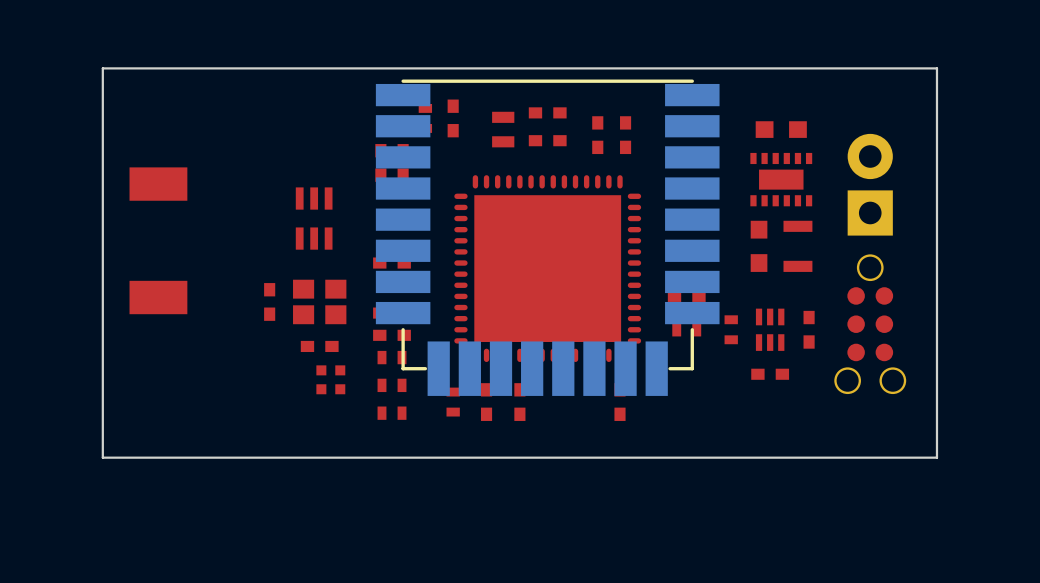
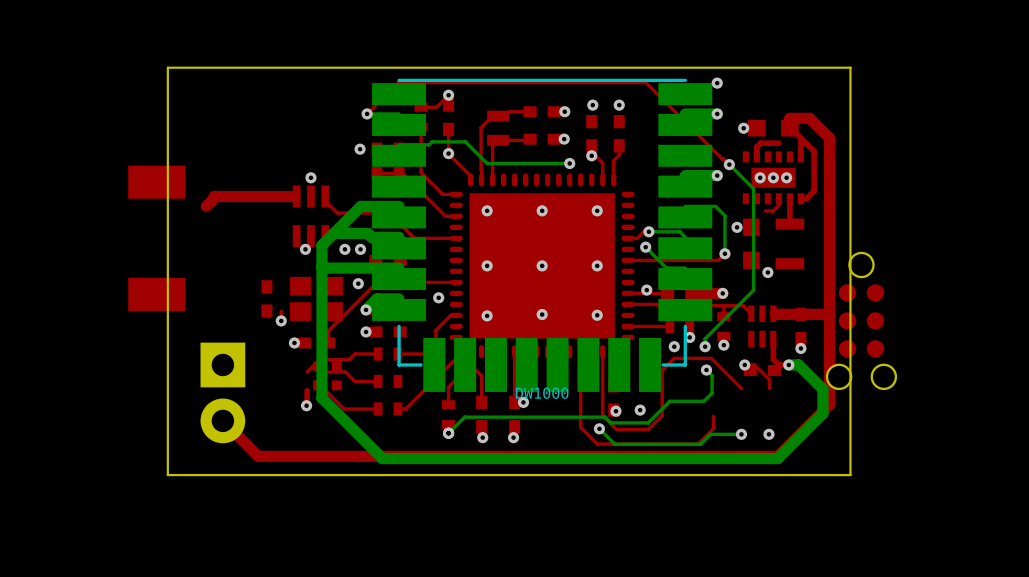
board edge: (859, 68) (936, 68) (936, 457) (102, 457) (102, 68) (169, 68) -> (850, 67) (850, 475) (167, 475) (167, 67)
via: none -> (717, 83)
via: none -> (448, 95)
top track: none -> (448, 105) (448, 95) (436, 107) (421, 107)
via: none -> (592, 105)
via: none -> (619, 105)
top track: none -> (530, 111) (509, 111) (505, 116) (492, 116) (481, 127) (481, 180)
via: none -> (564, 111)
top track: none -> (367, 113) (398, 82) (645, 82) (729, 164)
via: none -> (367, 113)
bottom track: none -> (399, 113) (367, 113)
bottom track: none -> (717, 113) (685, 113)
via: none -> (717, 113)
top track: none -> (421, 127) (421, 172) (442, 194) (456, 194)
via: none -> (743, 128)
top track: none -> (448, 129) (448, 154) (470, 176) (470, 180)
top track: none -> (800, 138) (800, 156)
top track: none -> (530, 139) (498, 140) (492, 145) (492, 180)
via: none -> (564, 139)
top track: none -> (619, 140) (619, 155) (613, 160) (613, 180)
top track: none -> (778, 143) (760, 143) (756, 146) (756, 156)
bottom track: none -> (399, 144) (465, 141) (487, 163) (569, 163)
via: none -> (360, 149)
top track: none -> (591, 152) (602, 163) (602, 180)
via: none -> (448, 153)
via: none -> (591, 155)
via: none -> (569, 163)
bottom track: none -> (729, 164) (753, 188) (753, 290) (705, 338) (705, 346)
via: none -> (729, 164)
top track: none -> (377, 173) (402, 173) (445, 216) (456, 216)
bottom track: none -> (717, 175) (685, 175)
via: none -> (717, 175)
via: none -> (310, 177)
via: none -> (760, 177)
via: none -> (773, 177)
via: none -> (786, 177)
part: (870, 184) -> none
top track: none -> (216, 196) (206, 206)
top track: none -> (296, 196) (214, 196)
top track: none -> (325, 196) (325, 200) (337, 213) (389, 213) (414, 238) (456, 238)
top track: none -> (778, 198) (778, 205) (773, 211) (765, 211)
top track: none -> (789, 198) (789, 224)
top track: none -> (800, 198) (806, 198) (814, 191) (814, 151) (789, 127) (789, 118) (809, 118) (829, 138) (829, 404) (777, 456) (258, 456) (222, 420)
bottom track: none -> (399, 206) (360, 206) (321, 245) (321, 398) (382, 458) (777, 458) (822, 413) (822, 389) (798, 364) (788, 364)
bottom track: none -> (685, 206) (715, 206) (724, 215) (724, 253)
via: none -> (487, 210)
via: none -> (542, 210)
via: none -> (597, 210)
via: none -> (737, 227)
top track: none -> (648, 231) (643, 231) (637, 238) (628, 238)
bottom track: none -> (648, 231) (679, 231) (685, 237)
via: none -> (648, 231)
bottom track: none -> (333, 233) (367, 233) (371, 237) (399, 237)
bottom track: none -> (645, 247) (666, 268) (685, 268)
via: none -> (645, 247)
via: none -> (305, 249)
via: none -> (344, 249)
via: none -> (360, 249)
top track: none -> (724, 253) (718, 260) (628, 260)
via: none -> (724, 253)
via: none -> (487, 265)
via: none -> (542, 265)
via: none -> (597, 265)
bottom track: none -> (321, 266) (399, 268)
via: none -> (767, 272)
top track: none -> (456, 282) (377, 282) (328, 330) (328, 342)
via: none -> (358, 283)
via: none -> (646, 290)
top track: none -> (667, 293) (628, 293)
top track: none -> (722, 293) (691, 293)
via: none -> (722, 293)
via: none -> (438, 297)
bottom track: none -> (399, 298) (377, 298) (366, 309)
top track: none -> (628, 304) (743, 305) (751, 313)
top track: none -> (723, 305) (723, 316)
via: none -> (366, 309)
top track: none -> (281, 311) (281, 320)
top track: none -> (775, 313) (829, 314)
via: none -> (542, 314)
top track: none -> (456, 315) (450, 315) (435, 330) (435, 344) (426, 353) (397, 353)
via: none -> (597, 315)
via: none -> (487, 315)
via: none -> (281, 320)
top track: none -> (669, 326) (628, 326)
via: none -> (366, 331)
top track: none -> (456, 337) (456, 358) (405, 409) (397, 409)
via: none -> (689, 337)
top track: none -> (773, 339) (773, 359) (778, 364) (788, 364)
via: none -> (294, 342)
via: none -> (723, 345)
via: none -> (674, 346)
via: none -> (705, 346)
via: none -> (800, 348)
top track: none -> (514, 351) (514, 402) (523, 402)
top track: none -> (580, 351) (580, 427) (597, 444) (698, 444) (713, 428) (713, 416)
top track: none -> (602, 351) (602, 415) (616, 429) (648, 429) (662, 415) (662, 370) (674, 358) (711, 358) (741, 388)
top track: none -> (378, 353) (355, 353) (349, 359) (319, 359) (307, 372)
top track: none -> (470, 364) (481, 375) (481, 402)
top track: none -> (470, 364) (448, 386) (448, 404)
top track: none -> (744, 364) (754, 364) (769, 379) (769, 388)
via: none -> (744, 364)
via: none -> (788, 364)
bottom track: none -> (706, 370) (712, 375) (712, 393) (704, 401) (669, 401) (648, 422) (610, 422) (605, 417) (464, 417) (448, 433)
via: none -> (706, 370)
top track: none -> (325, 372) (345, 372) (355, 381) (378, 381)
top track: none -> (307, 390) (306, 405)
top track: none -> (325, 390) (344, 409) (378, 409)
part: none -> (222, 392)
text: none -> DW1000 (542, 393)
part position: (453, 402) -> (448, 414)
part position: (486, 402) -> (481, 414)
part position: (519, 402) -> (514, 414)
via: none -> (523, 402)
via: none -> (306, 405)
via: none -> (640, 410)
via: none -> (615, 411)
bottom track: none -> (599, 428) (614, 444) (700, 444) (710, 434) (741, 434)
via: none -> (599, 428)
via: none -> (448, 433)
via: none -> (741, 434)
via: none -> (768, 434)
via: none -> (482, 437)
via: none -> (513, 437)

